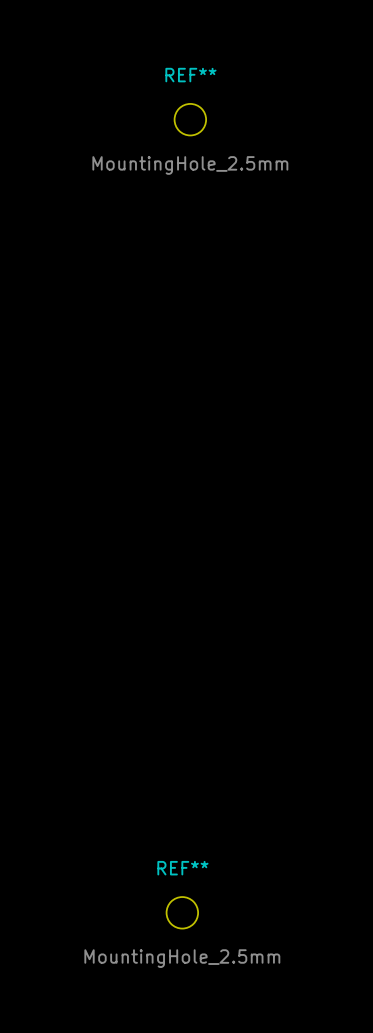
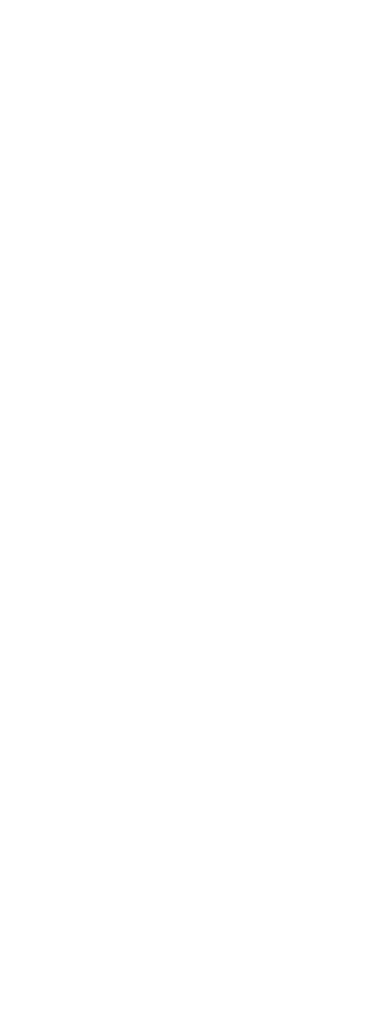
REF**: MountingHole_2.5mm (190, 119) -> none
REF**: MountingHole_2.5mm (182, 912) -> none

